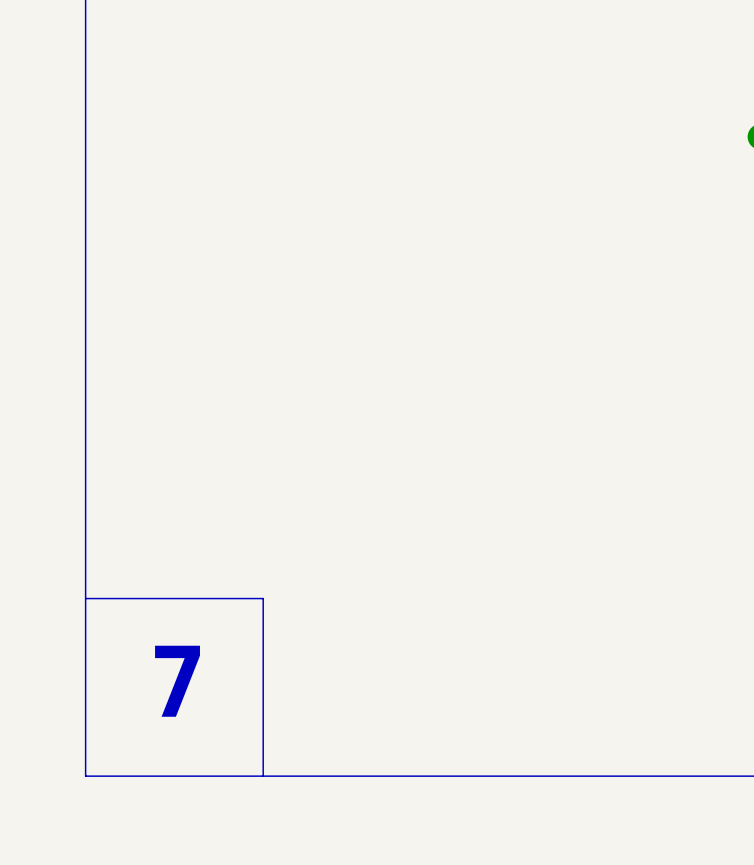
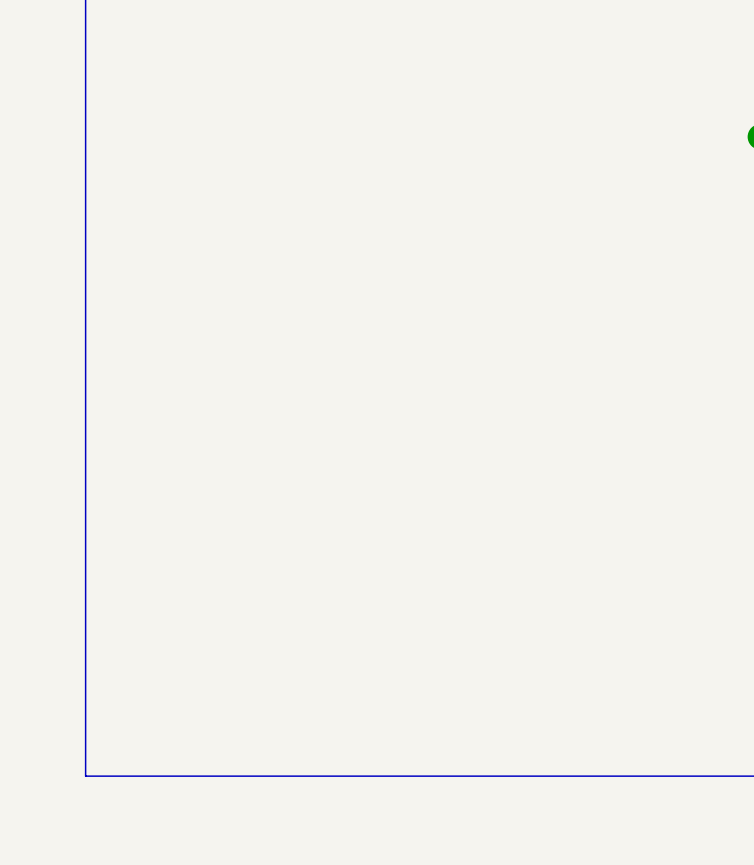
line: (85, 598) (263, 598) (263, 776) -> none
text: 7 (177, 681) -> none

